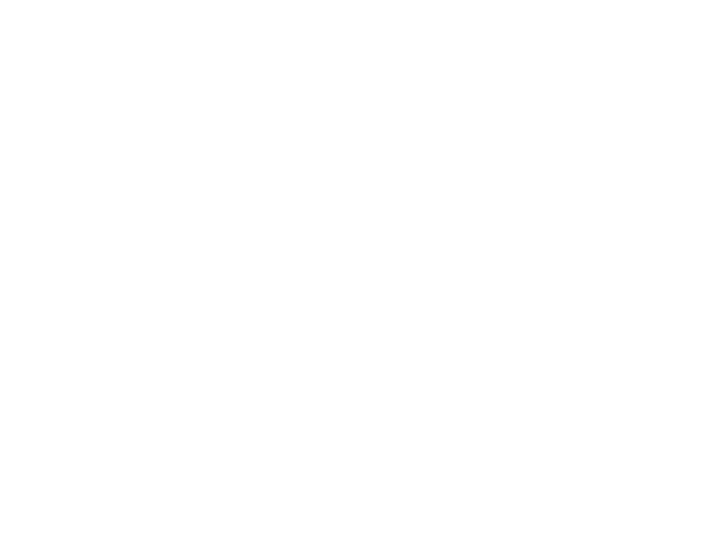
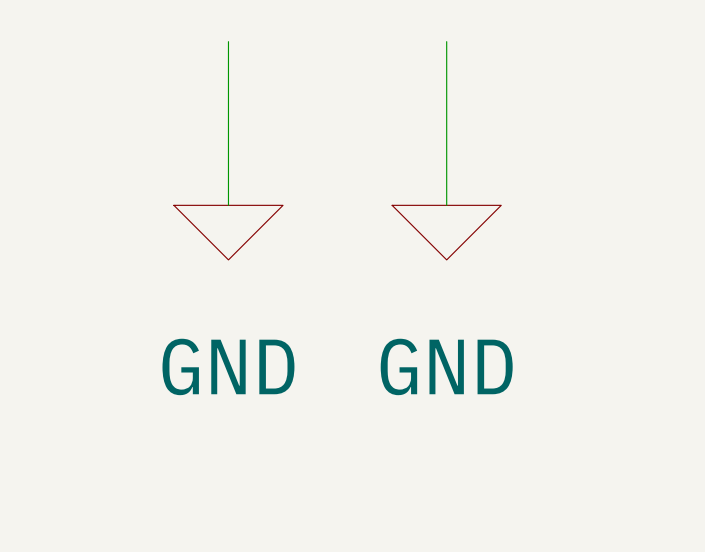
wire: none -> (228, 41) (228, 205)
wire: none -> (446, 41) (446, 205)
power symbol: none -> GND (228, 232)
power symbol: none -> GND (446, 232)

